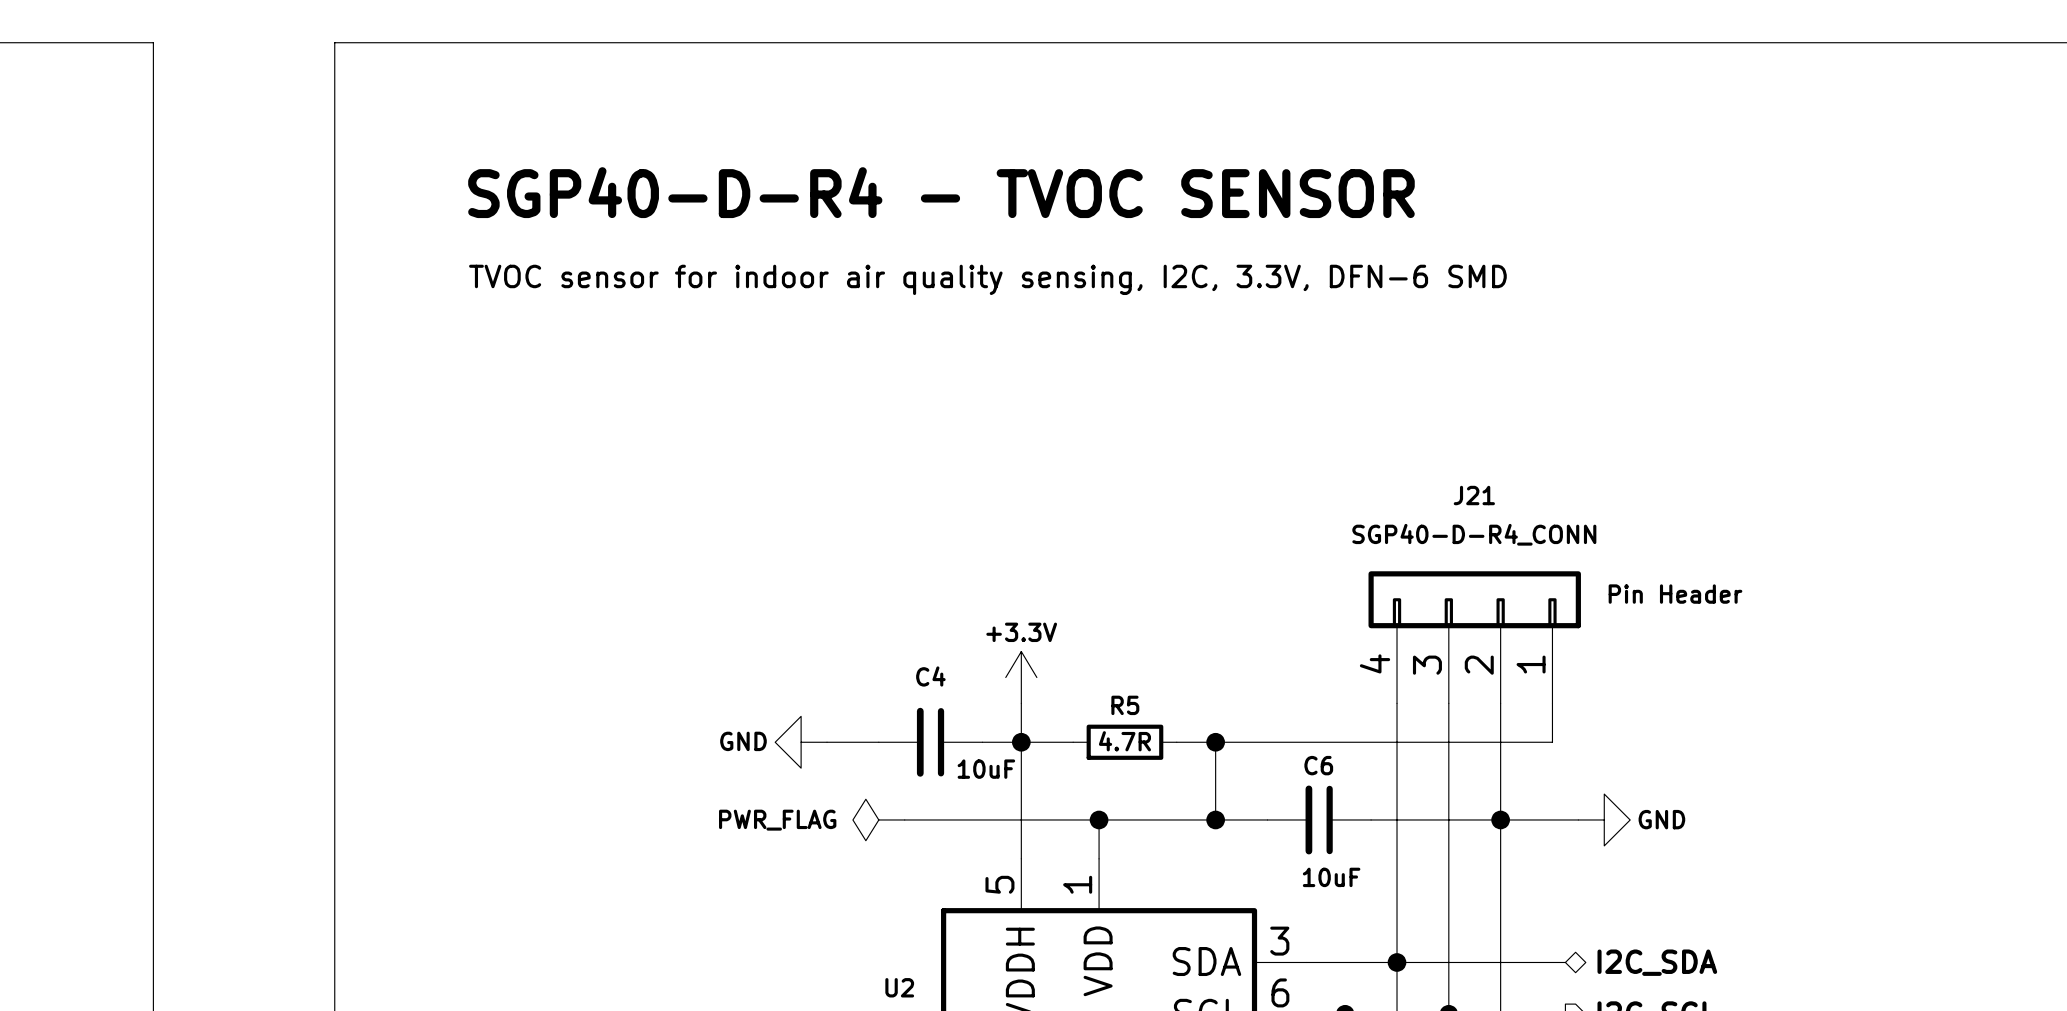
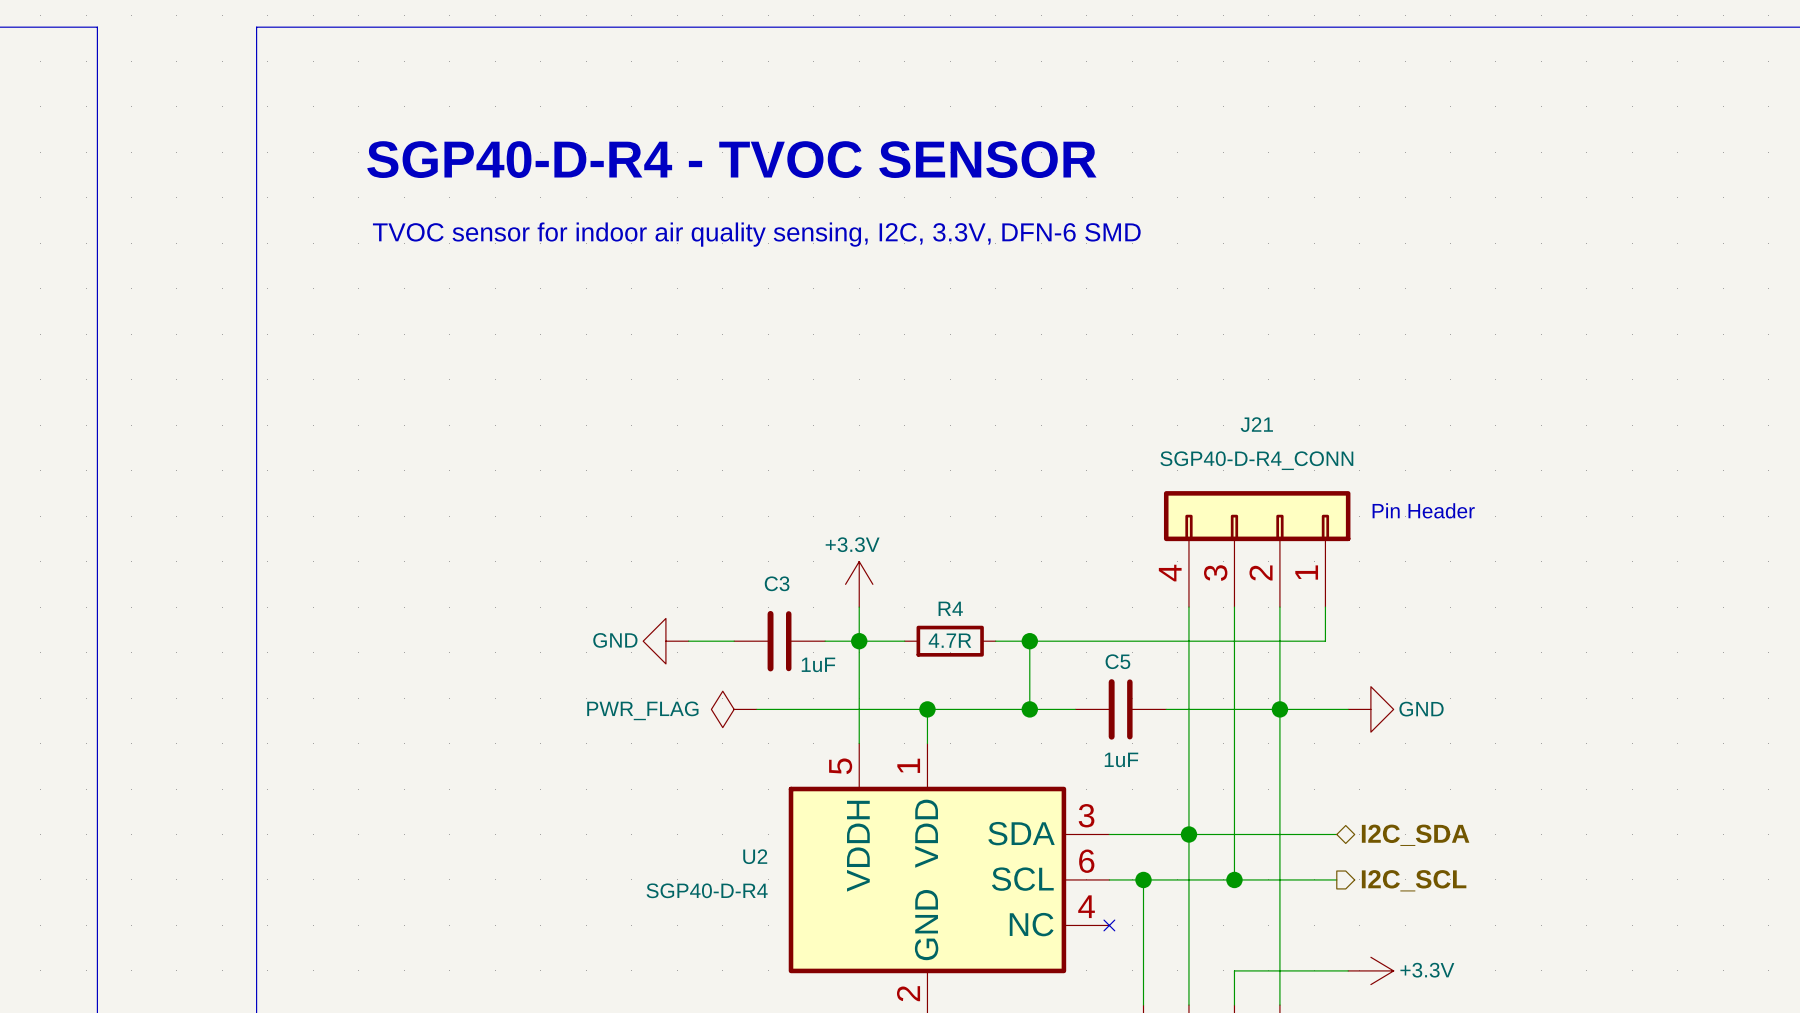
C4 name: C4 (930, 676) -> C3 (777, 583)
R5 name: R5 (1125, 705) -> R4 (950, 608)
C6 name: C6 (1318, 765) -> C5 (1117, 661)
C4 value: 10uF (986, 769) -> 1uF (818, 664)
C6 value: 10uF (1331, 877) -> 1uF (1121, 759)

